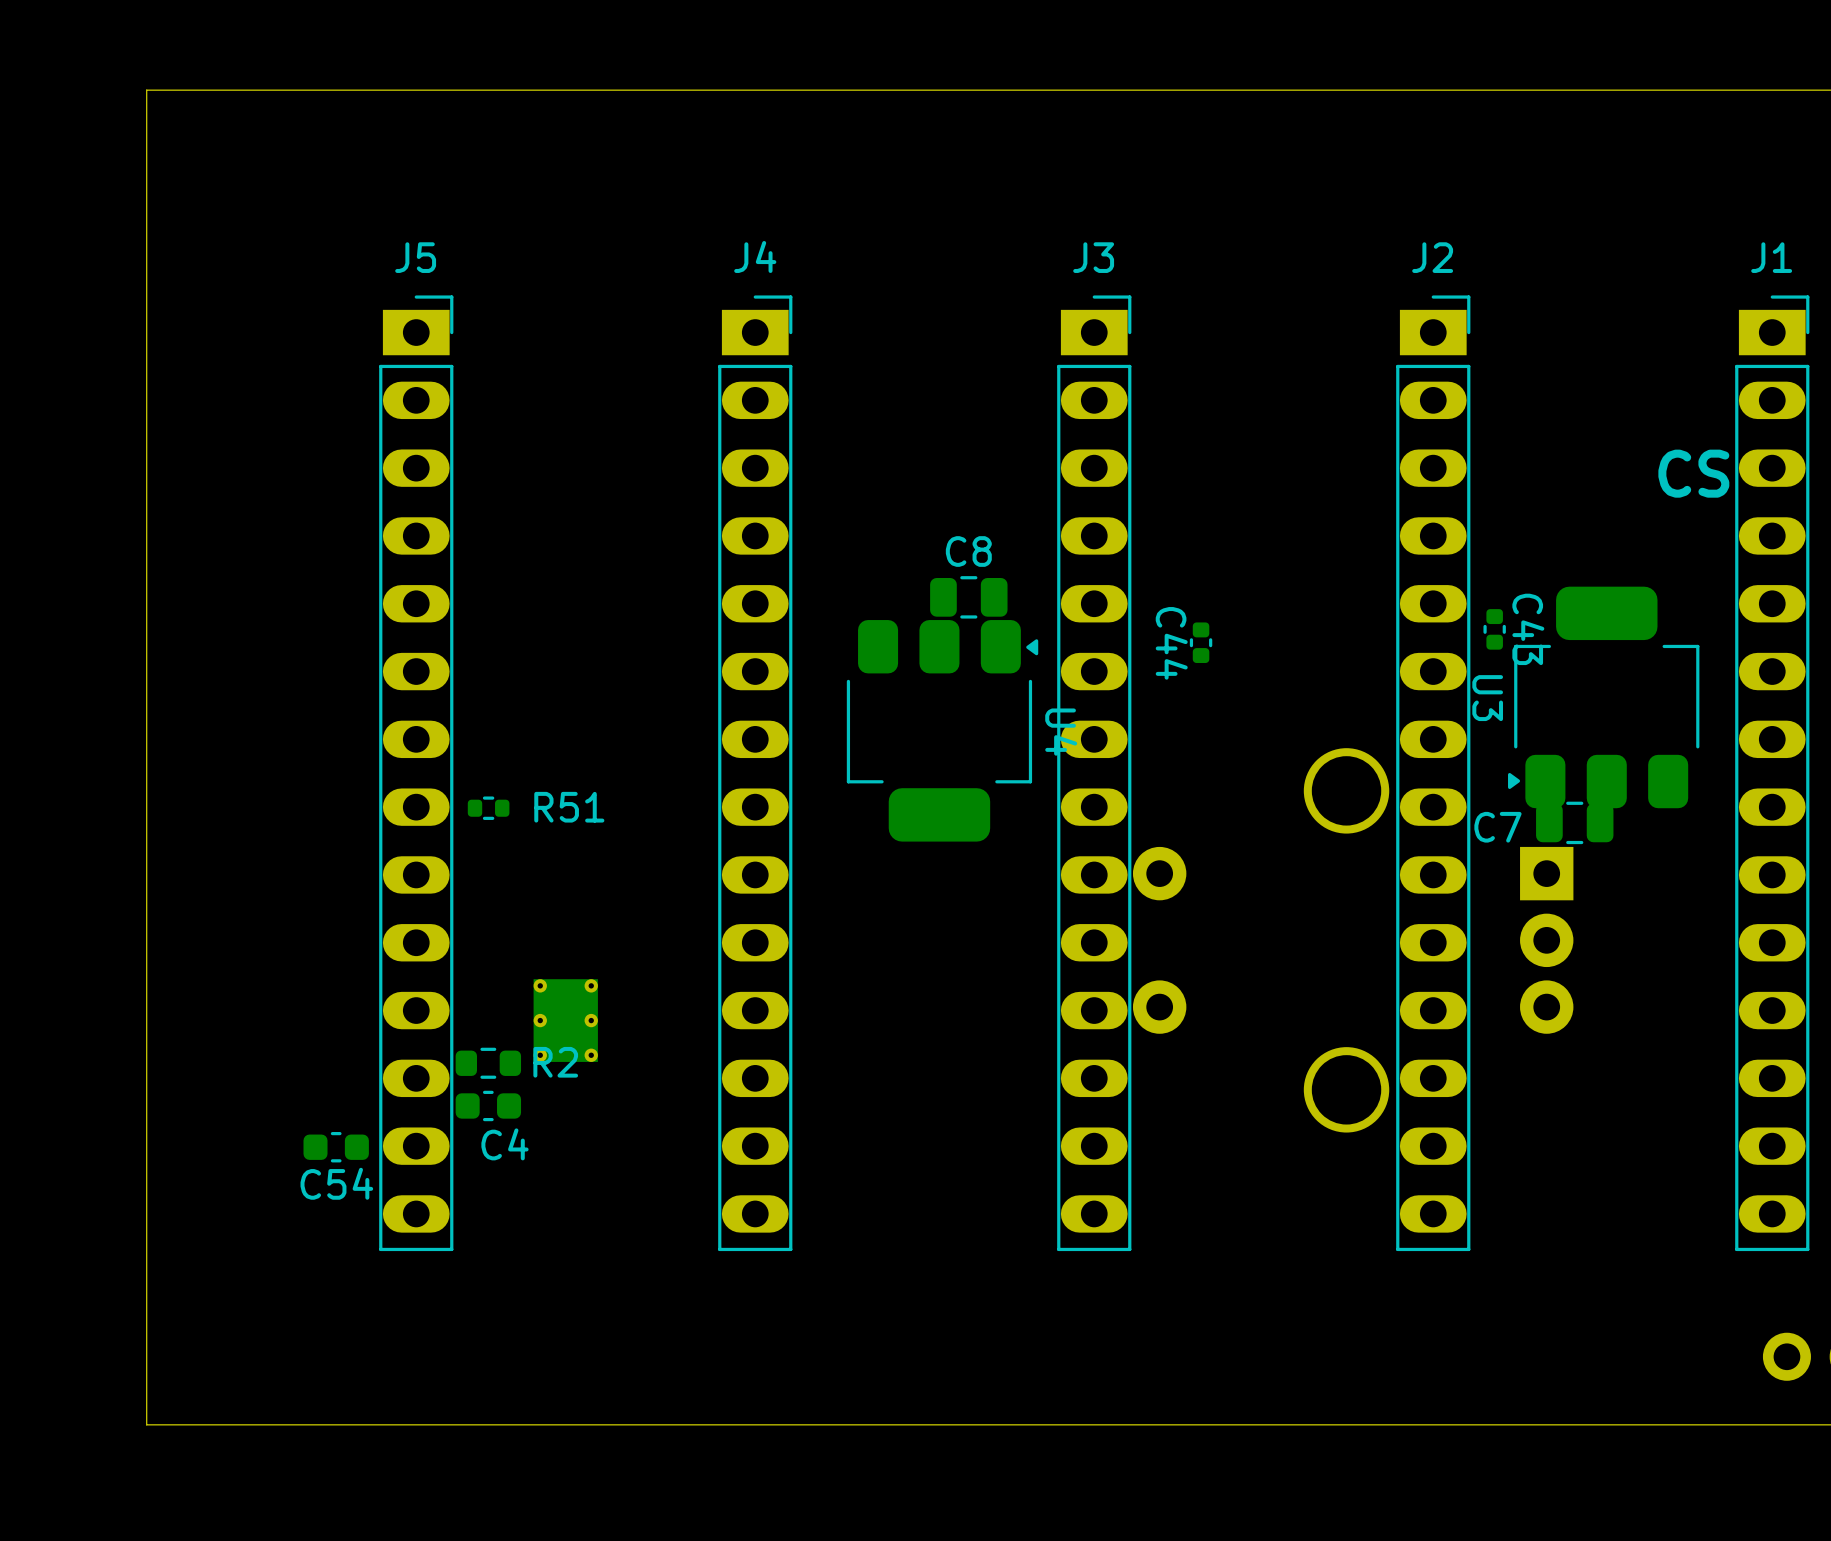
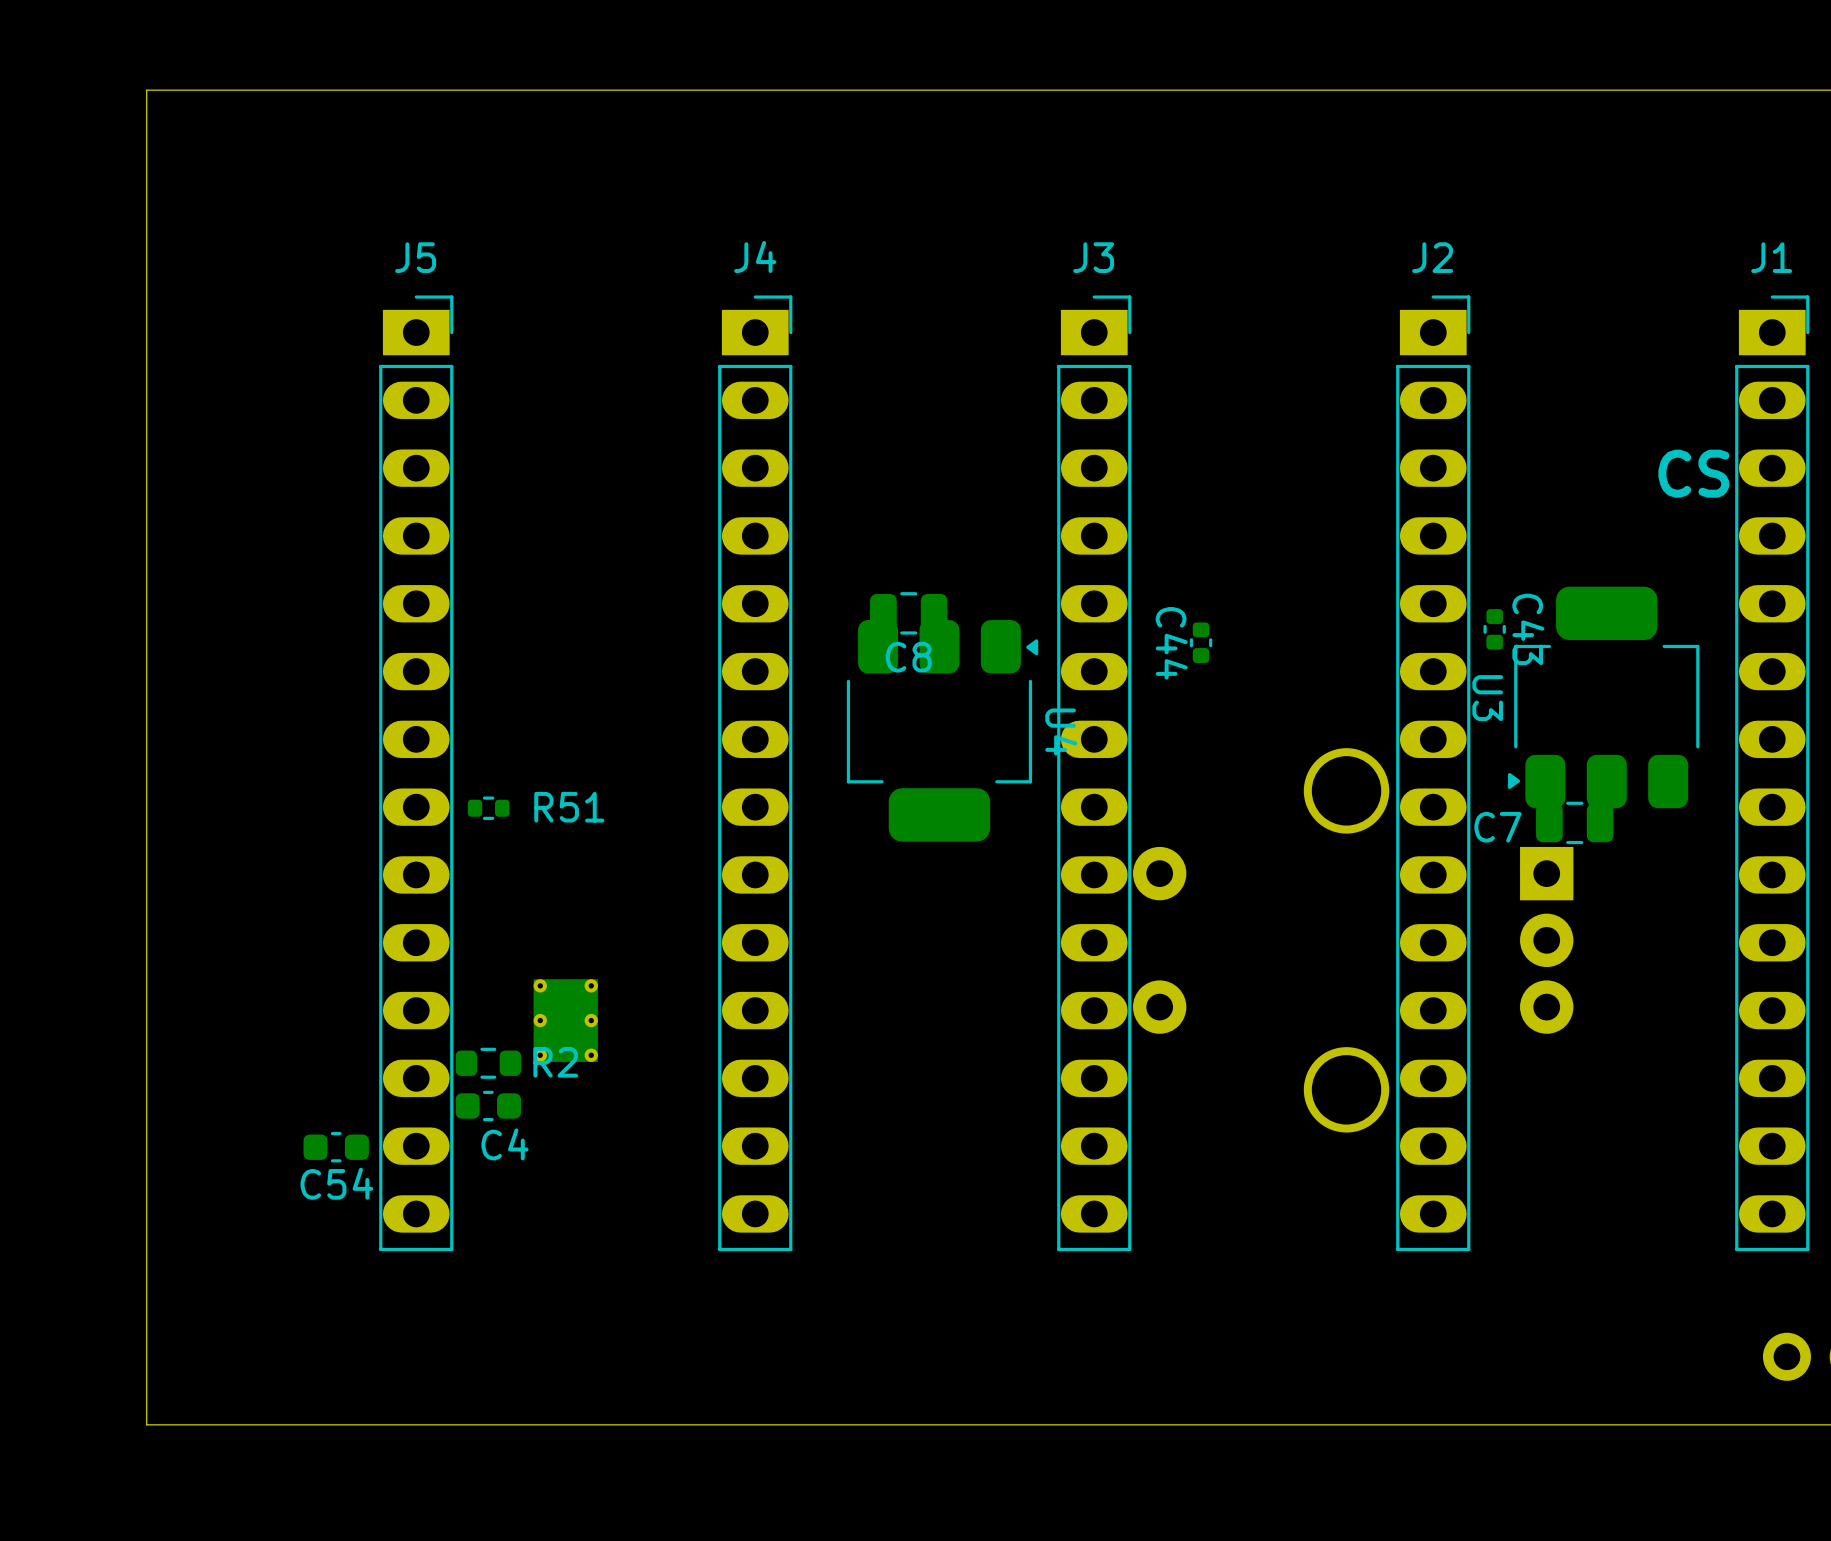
C8 name position: C8 (968, 551) -> C8 (908, 657)
C8 position: (968, 597) -> (908, 613)

